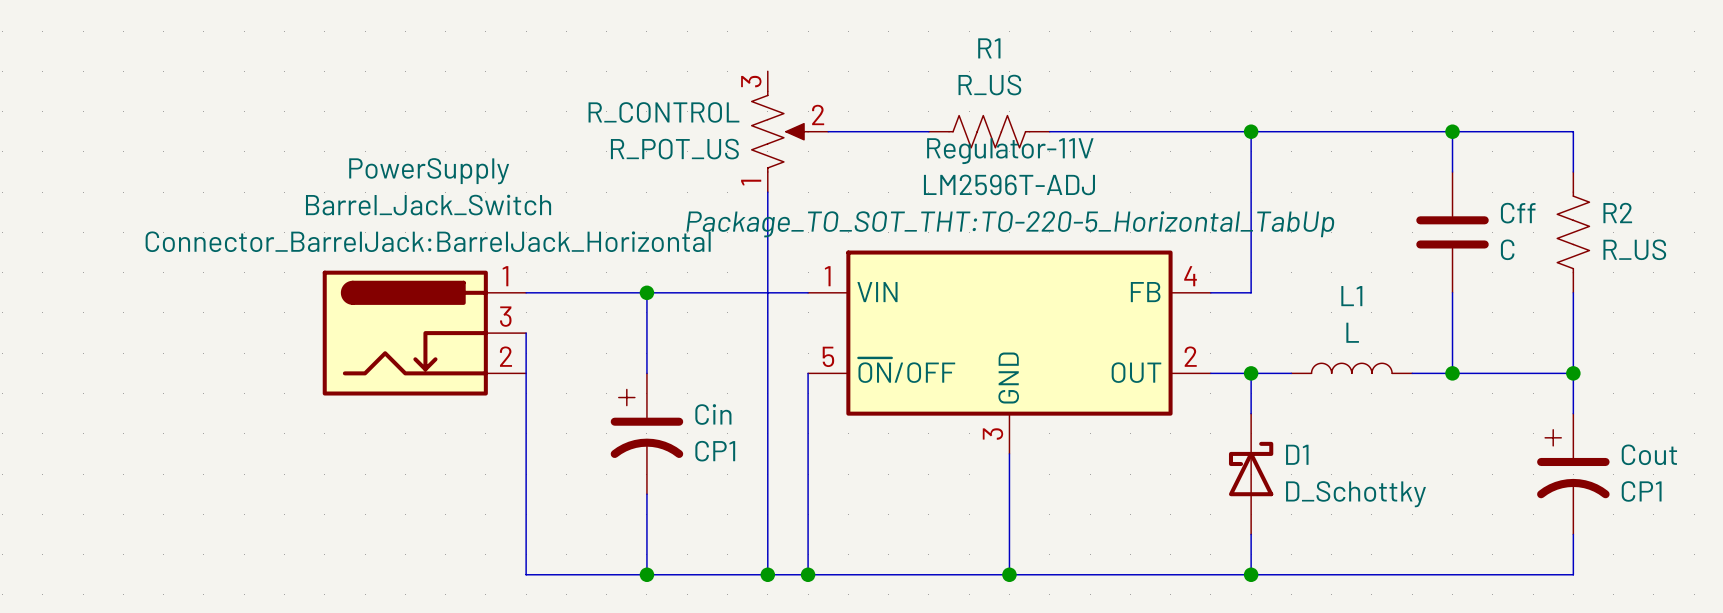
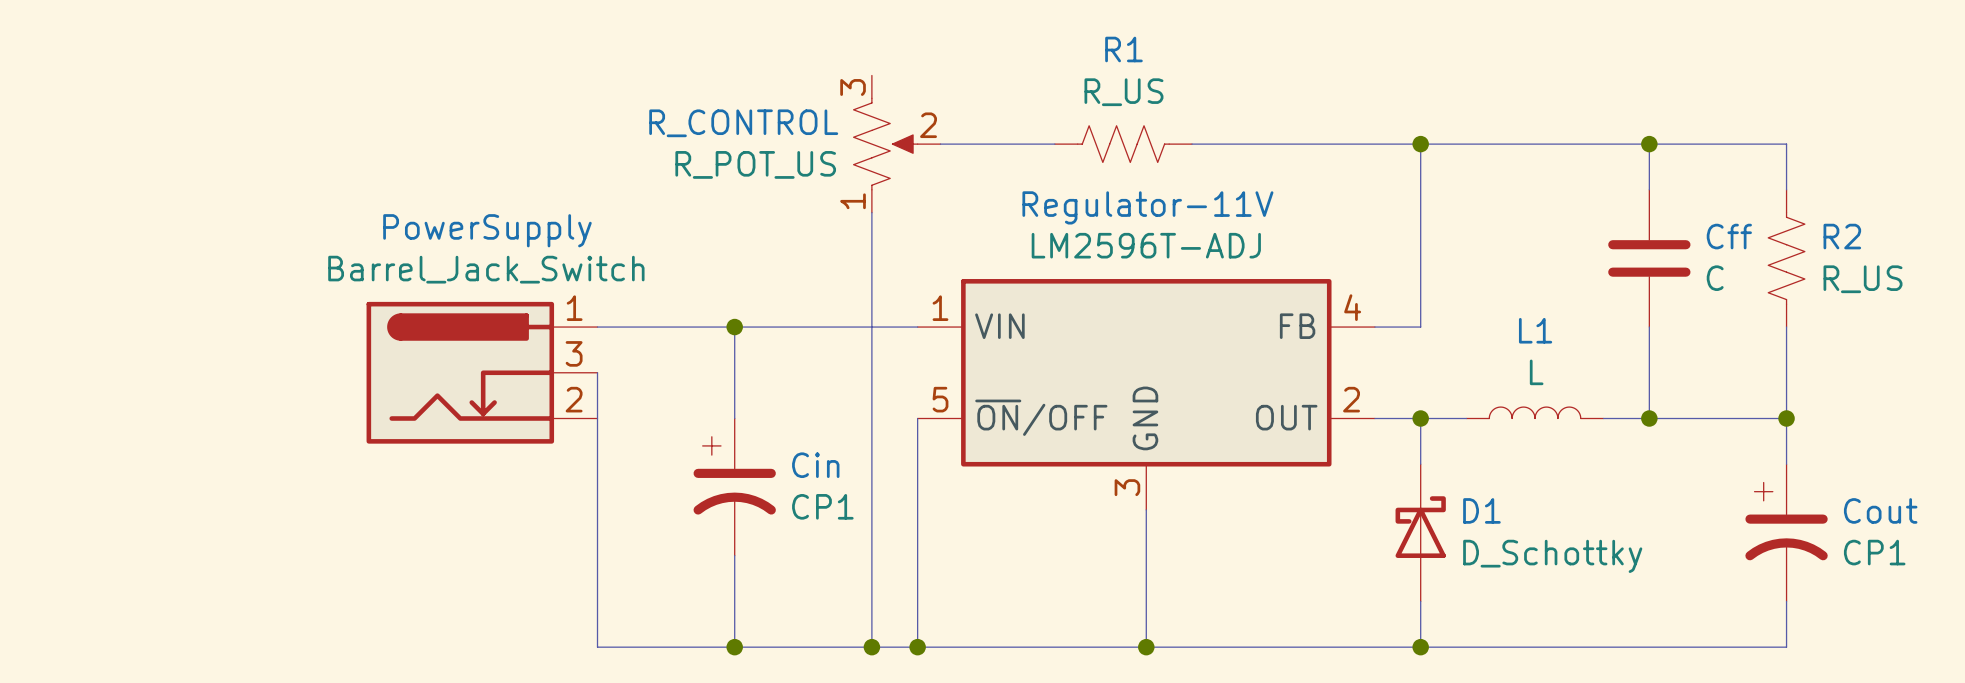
Regulator-11V name position: Regulator-11V (1010, 151) -> Regulator-11V (1147, 207)
PowerSupply name position: PowerSupply (429, 171) -> PowerSupply (487, 230)
Regulator-11V value position: LM2596T-ADJ (1009, 184) -> LM2596T-ADJ (1146, 245)
PowerSupply value position: Barrel_Jack_Switch (428, 205) -> Barrel_Jack_Switch (486, 269)
Regulator-11V text: Package_TO_SOT_THT:TO-220-5_Horizontal_TabUp (1010, 224) -> none
PowerSupply text: Connector_BarrelJack:BarrelJack_Horizontal (428, 241) -> none

